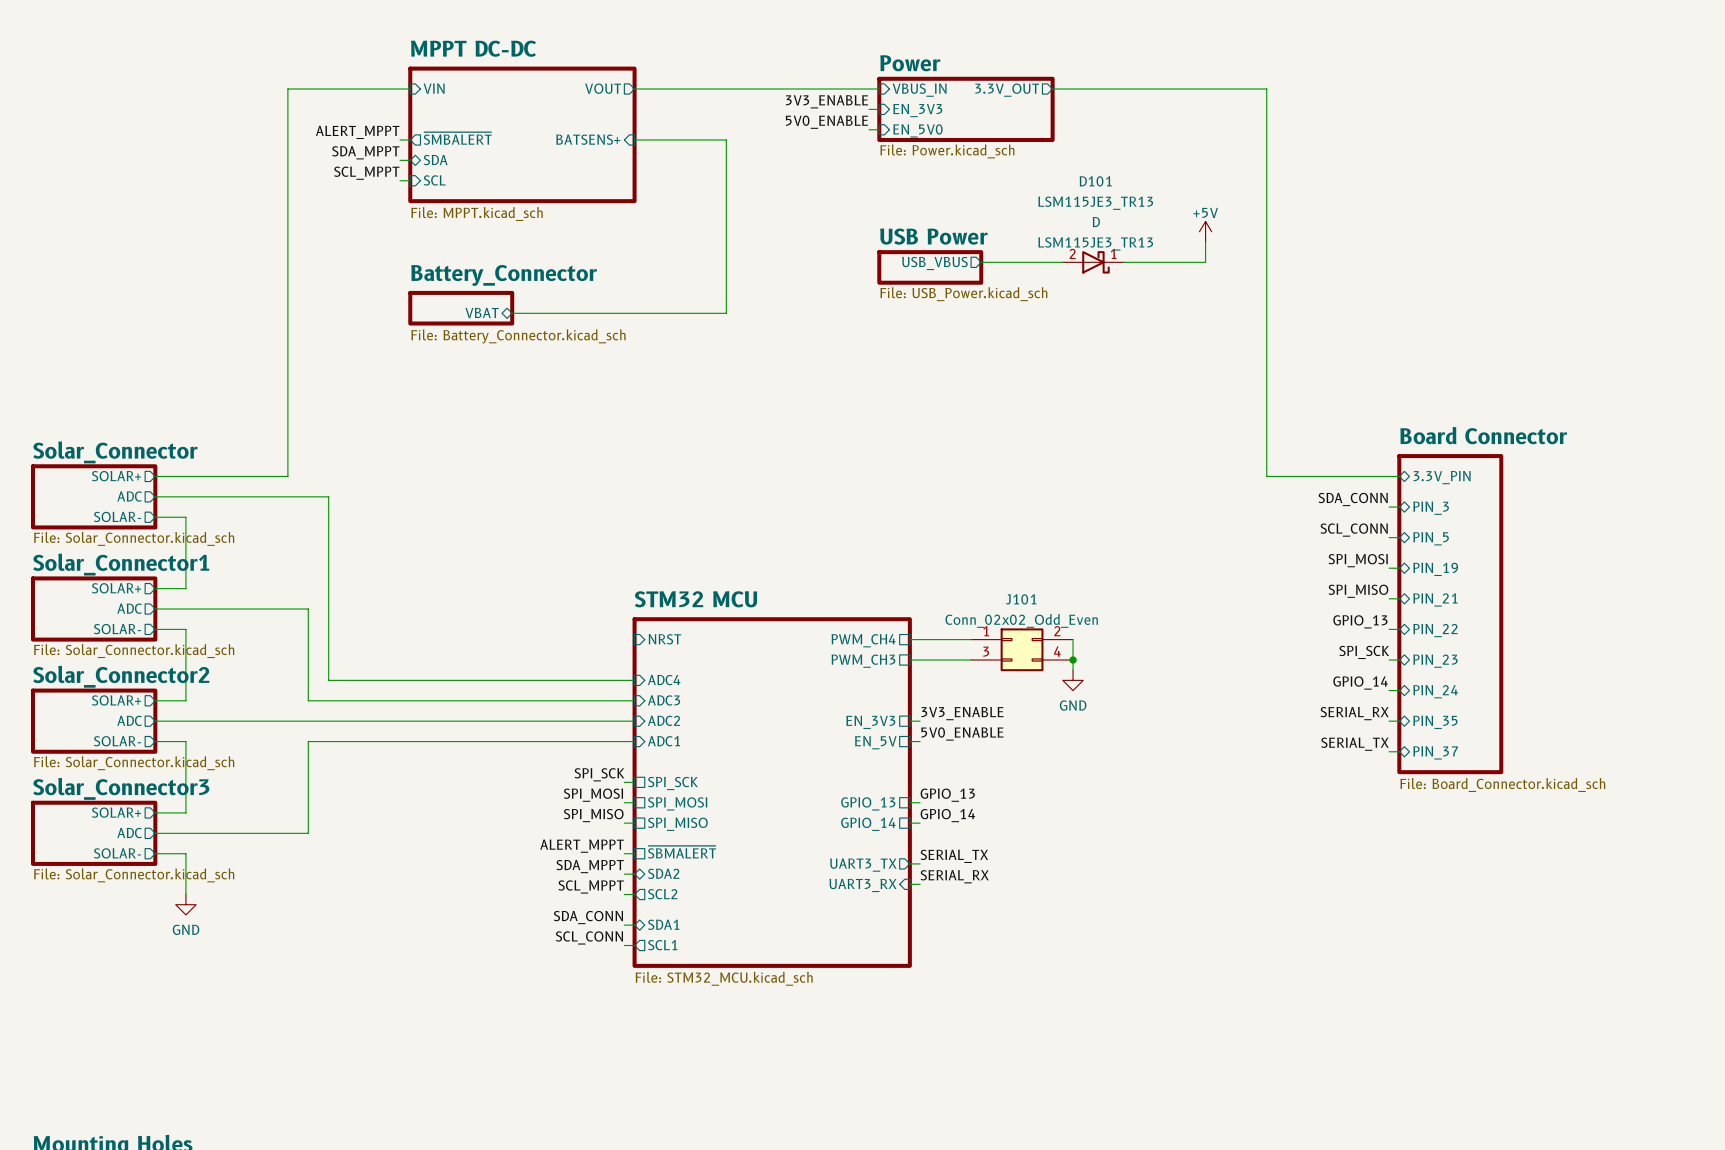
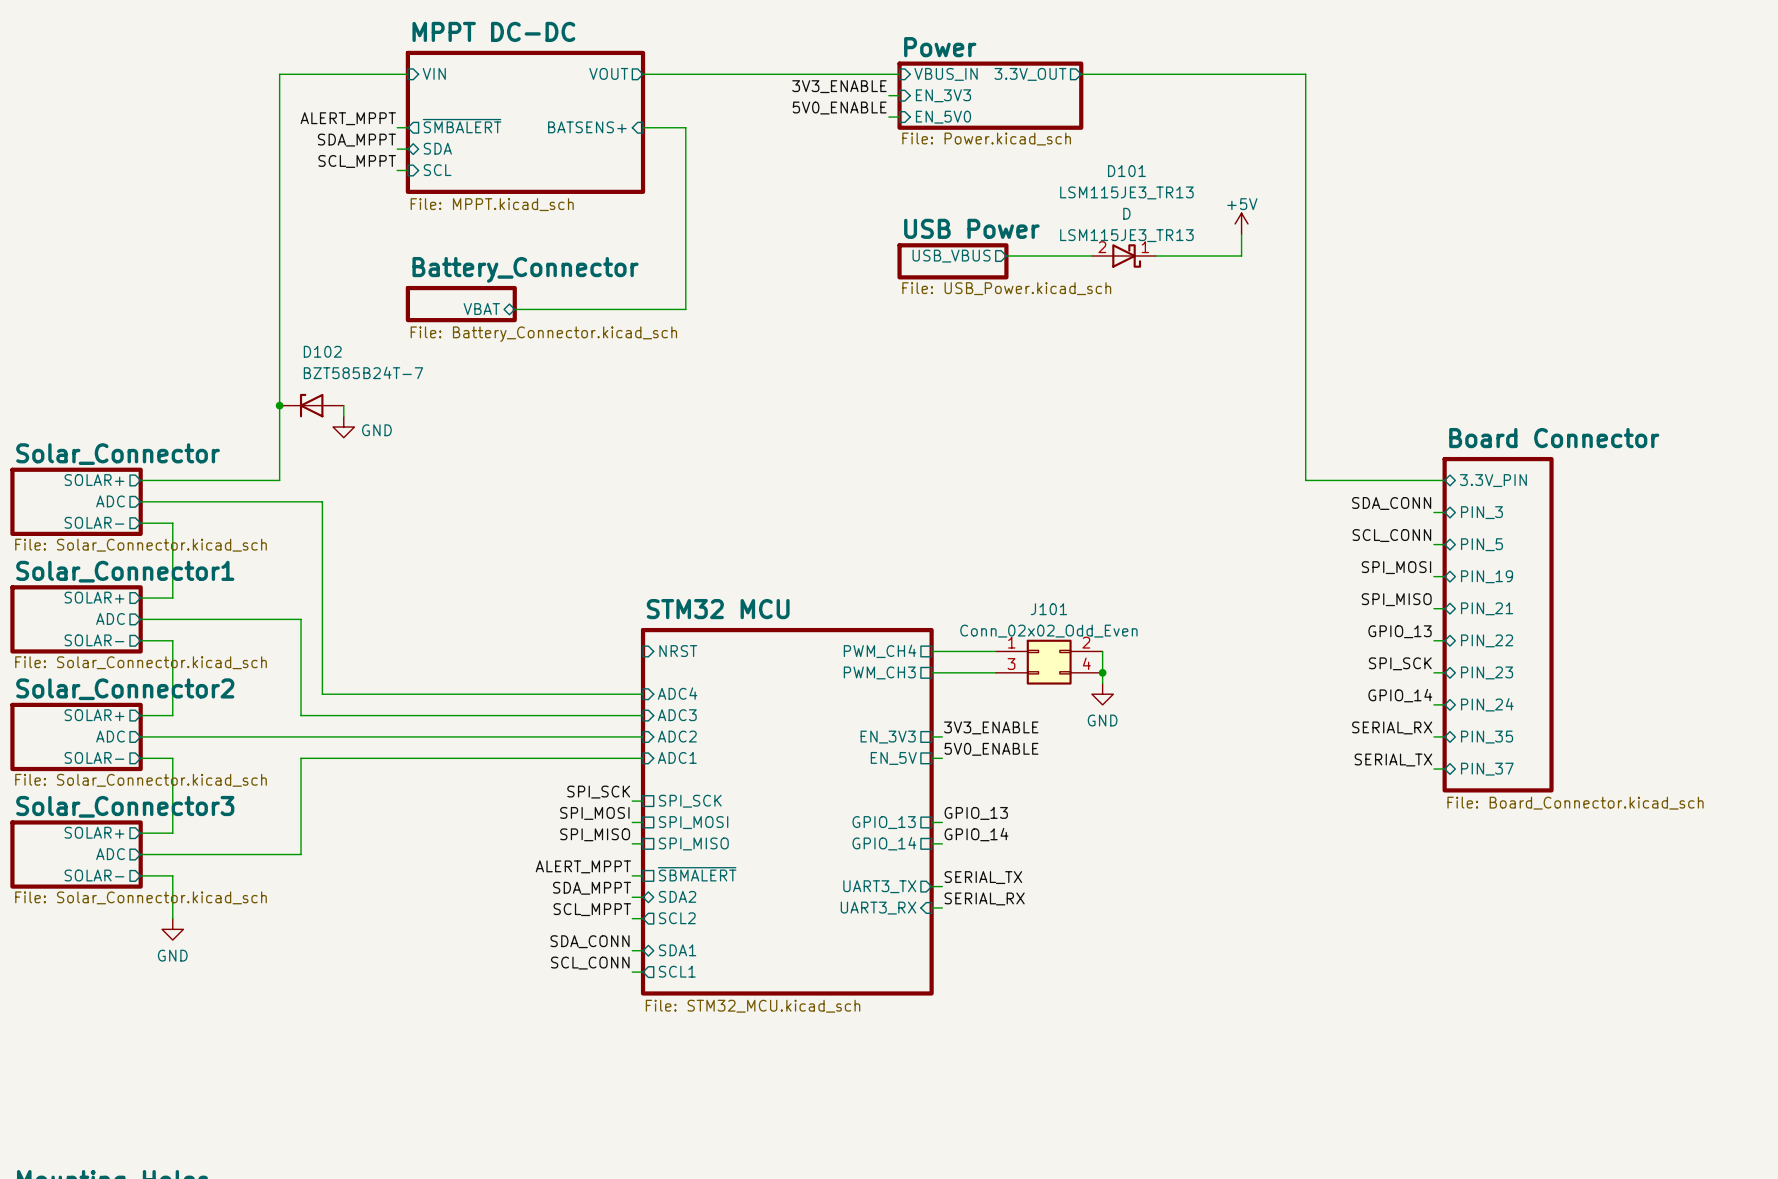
wire: (675, 139) (726, 139) (726, 313) (675, 313) -> (685, 127) (685, 309)
junction: none -> (279, 405)
D102: none -> BZT585B24T-7 (311, 405)
wire: none -> (343, 405) (343, 416)
power symbol: none -> GND (343, 427)

